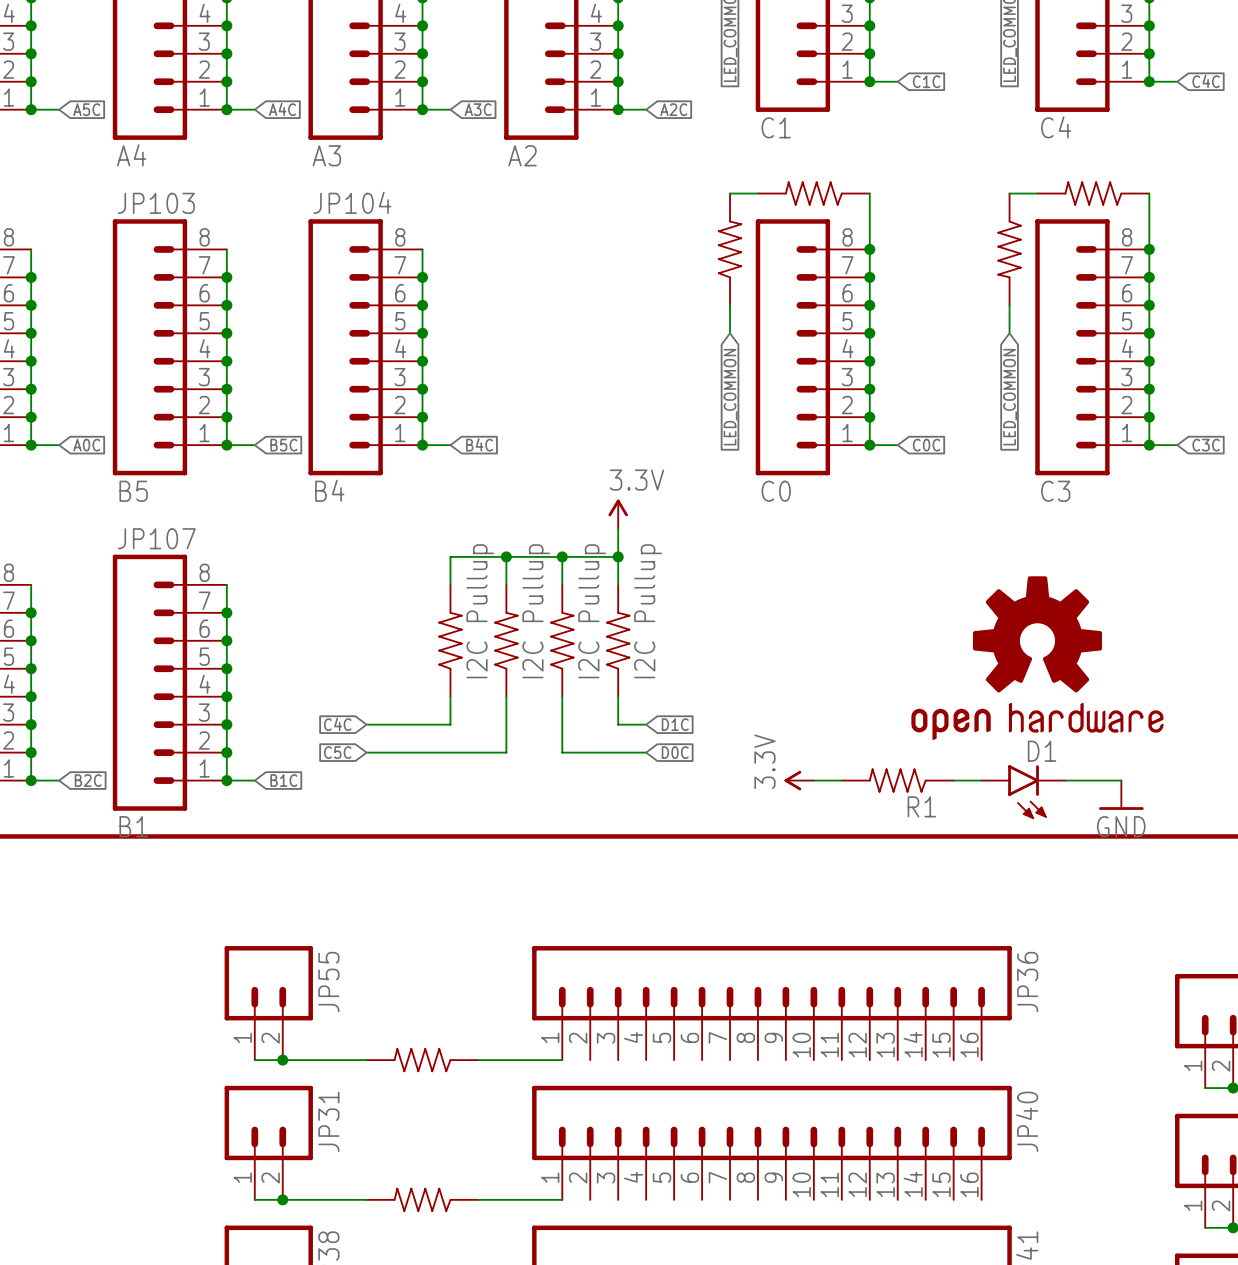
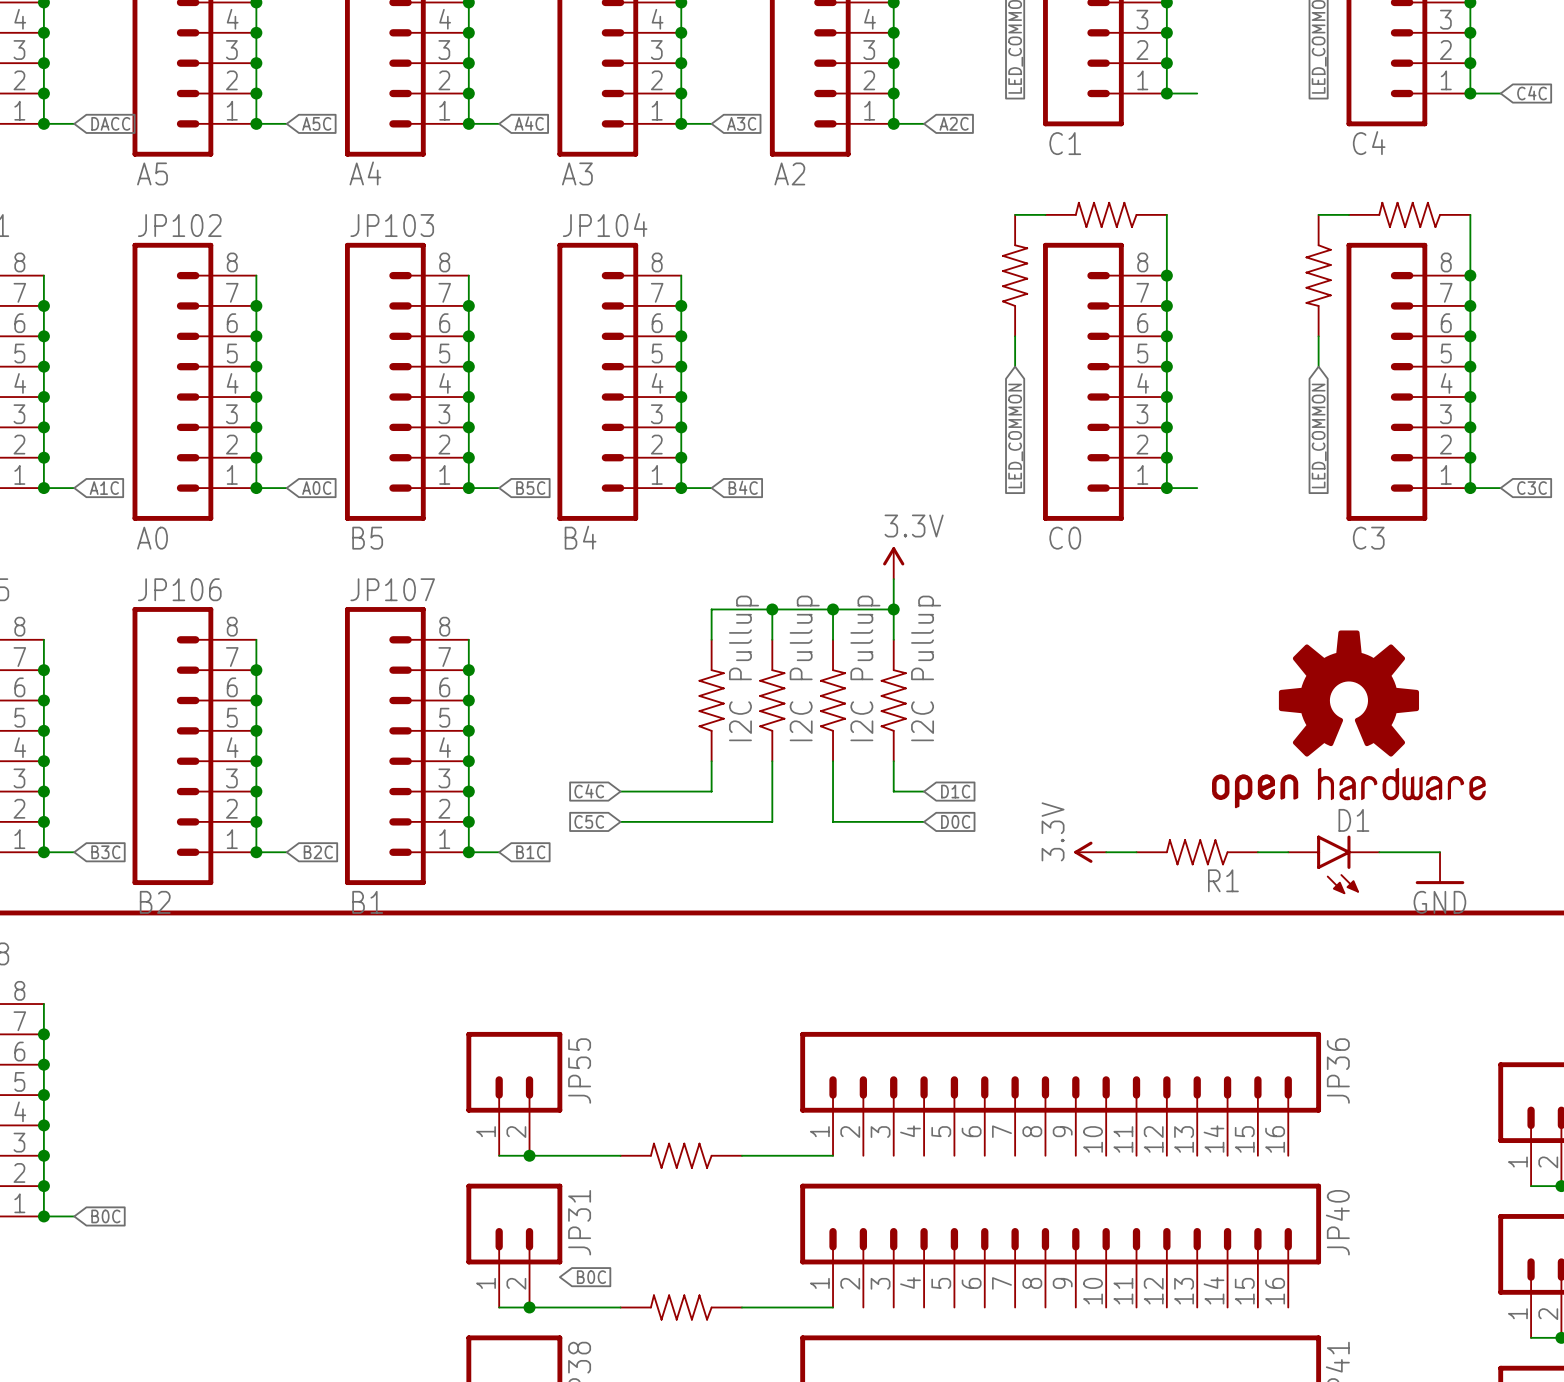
global label: C1C (926, 81) -> none
global label: C0C (926, 445) -> none
global label: none -> B0C (591, 1277)

